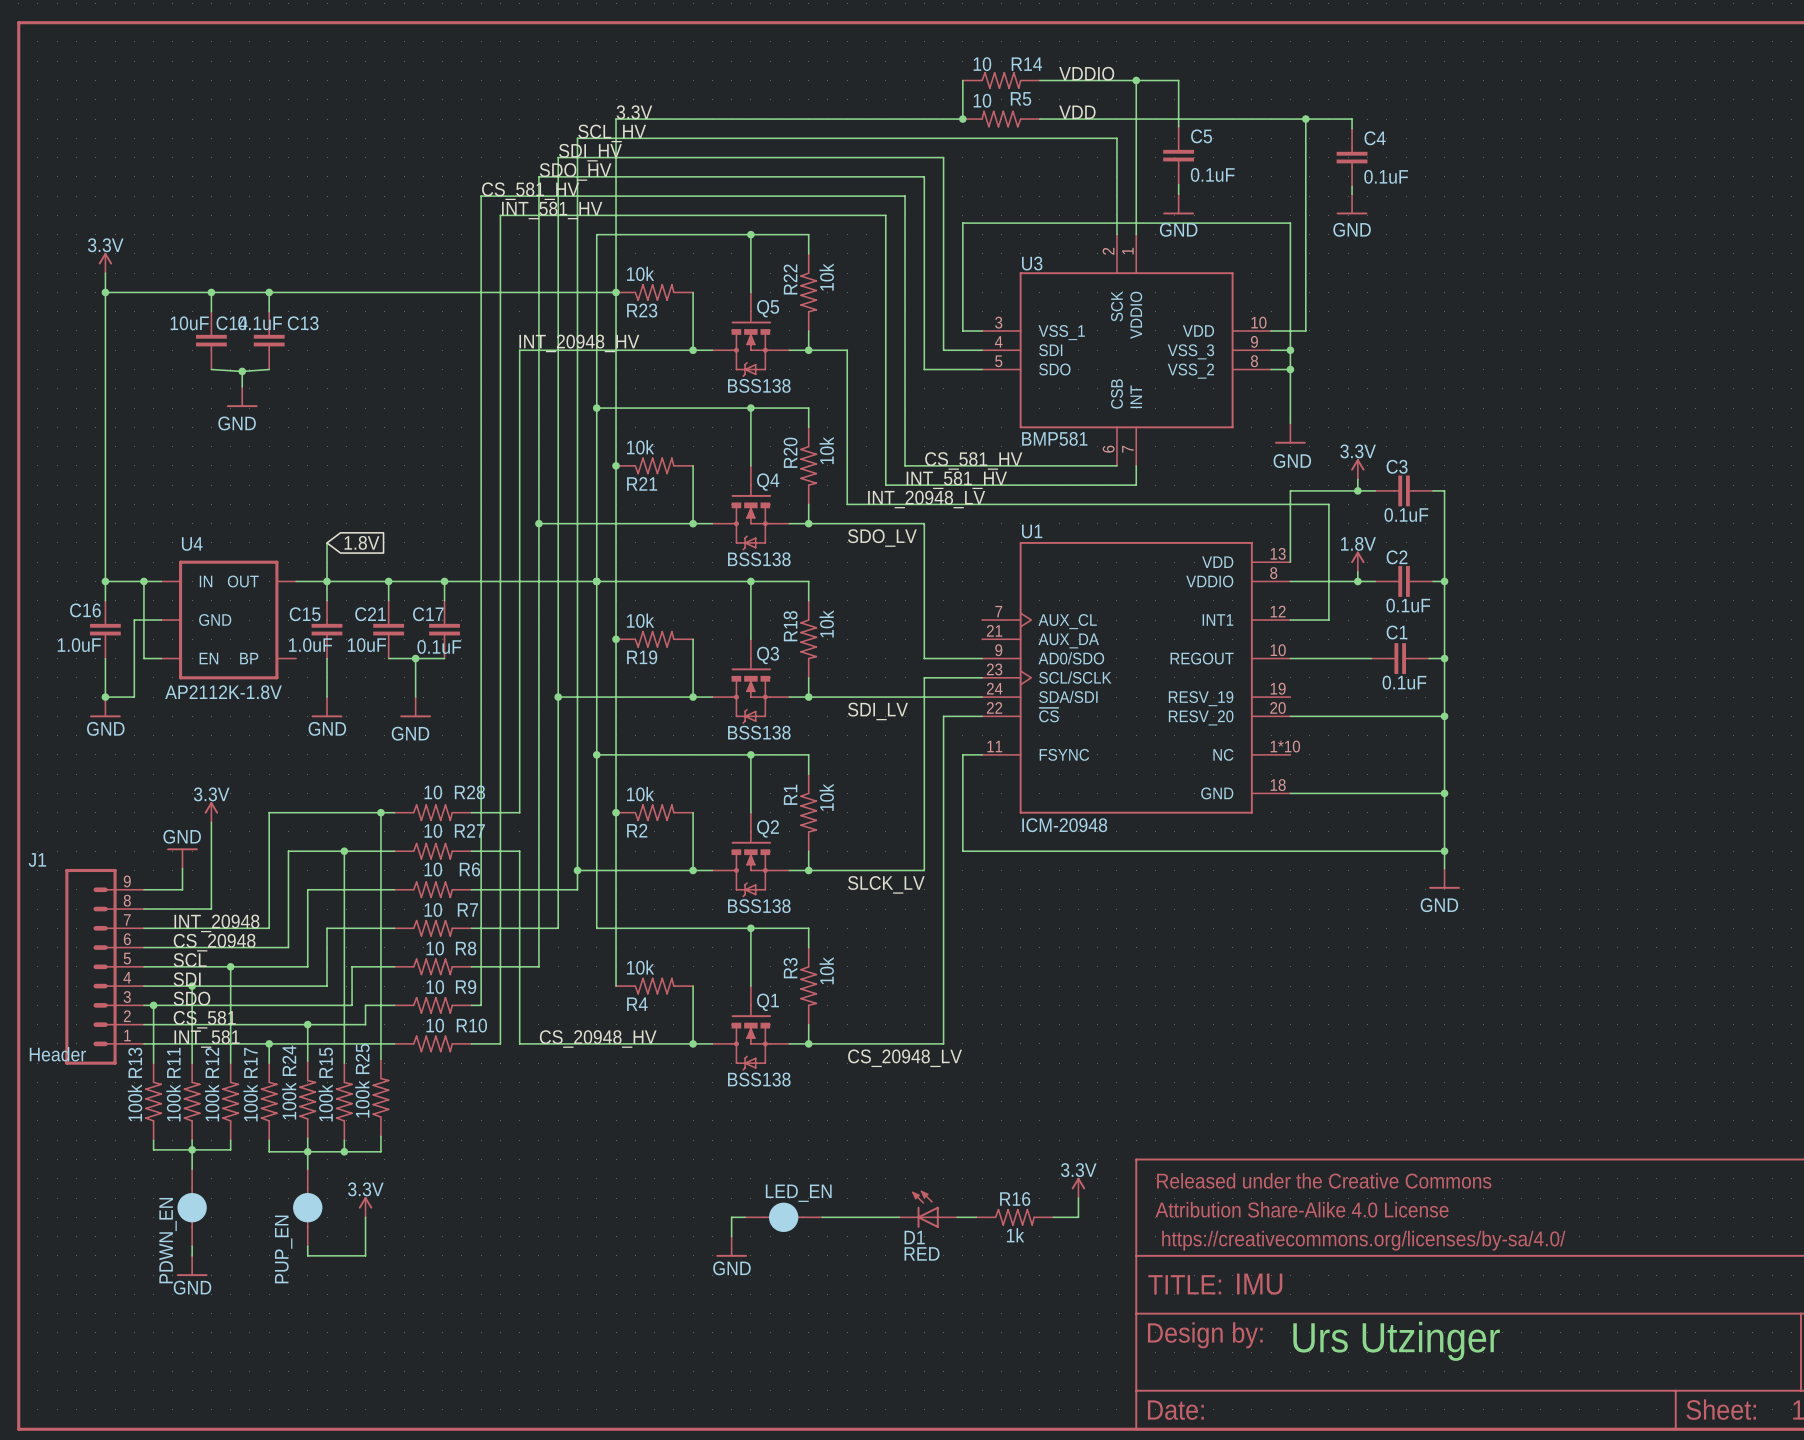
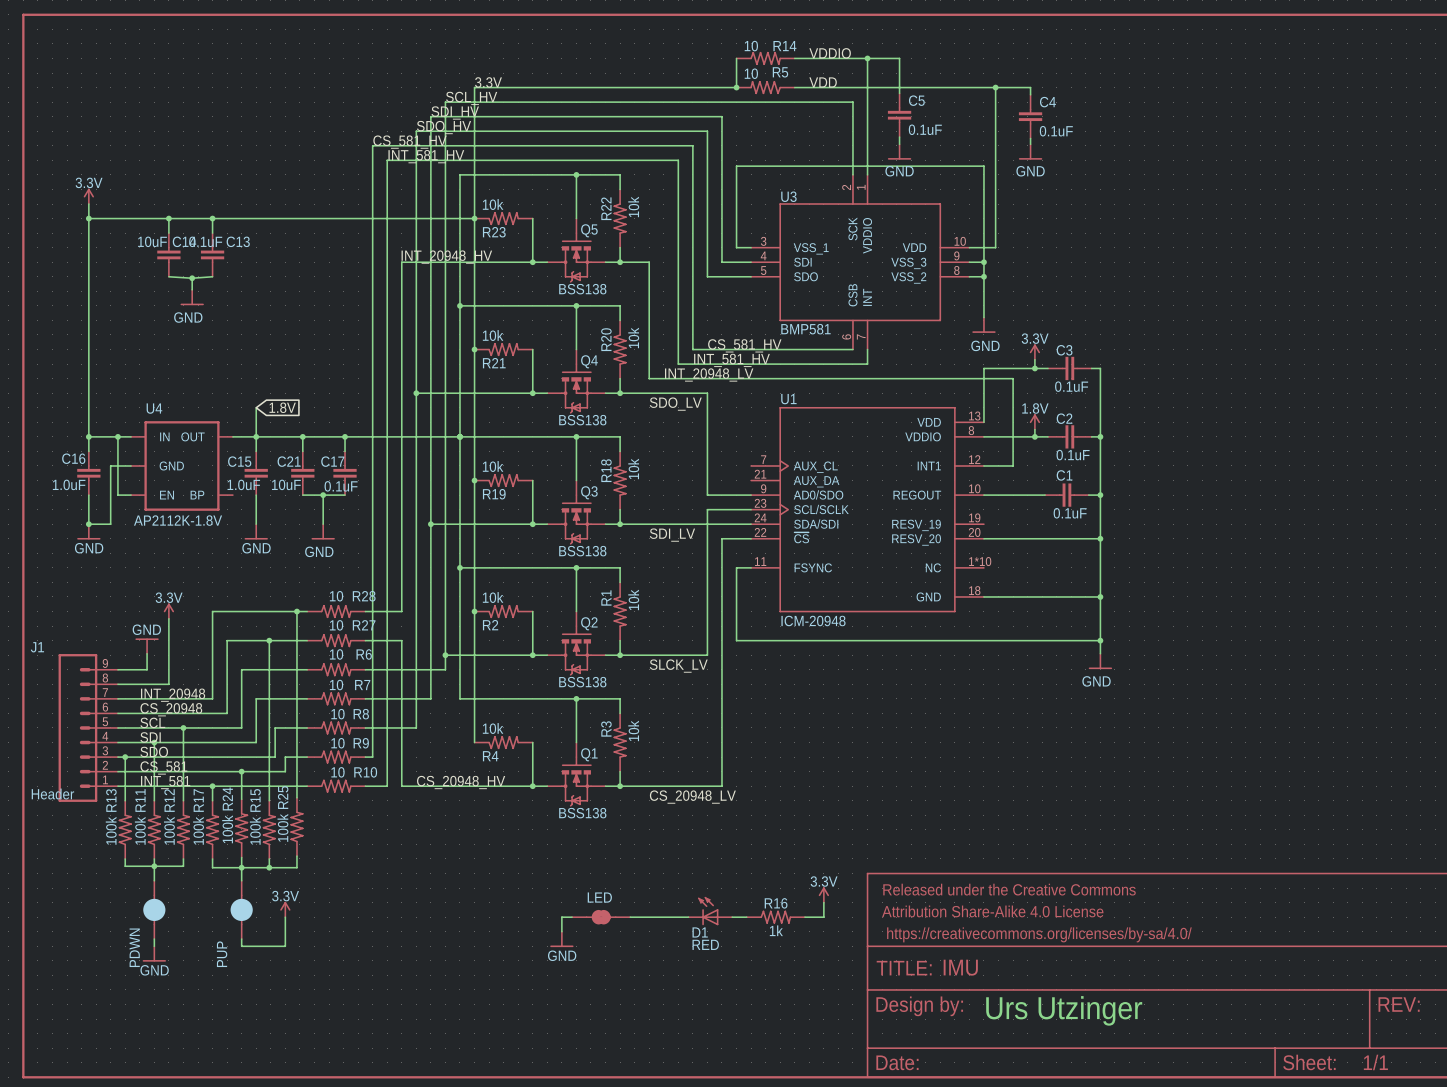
LED_EN: (783, 1217) -> none
LED: none -> (601, 917)
PDWN_EN name: PDWN_EN (168, 1240) -> PDWN (134, 947)
PUP_EN name: PUP_EN (283, 1249) -> PUP (222, 954)

